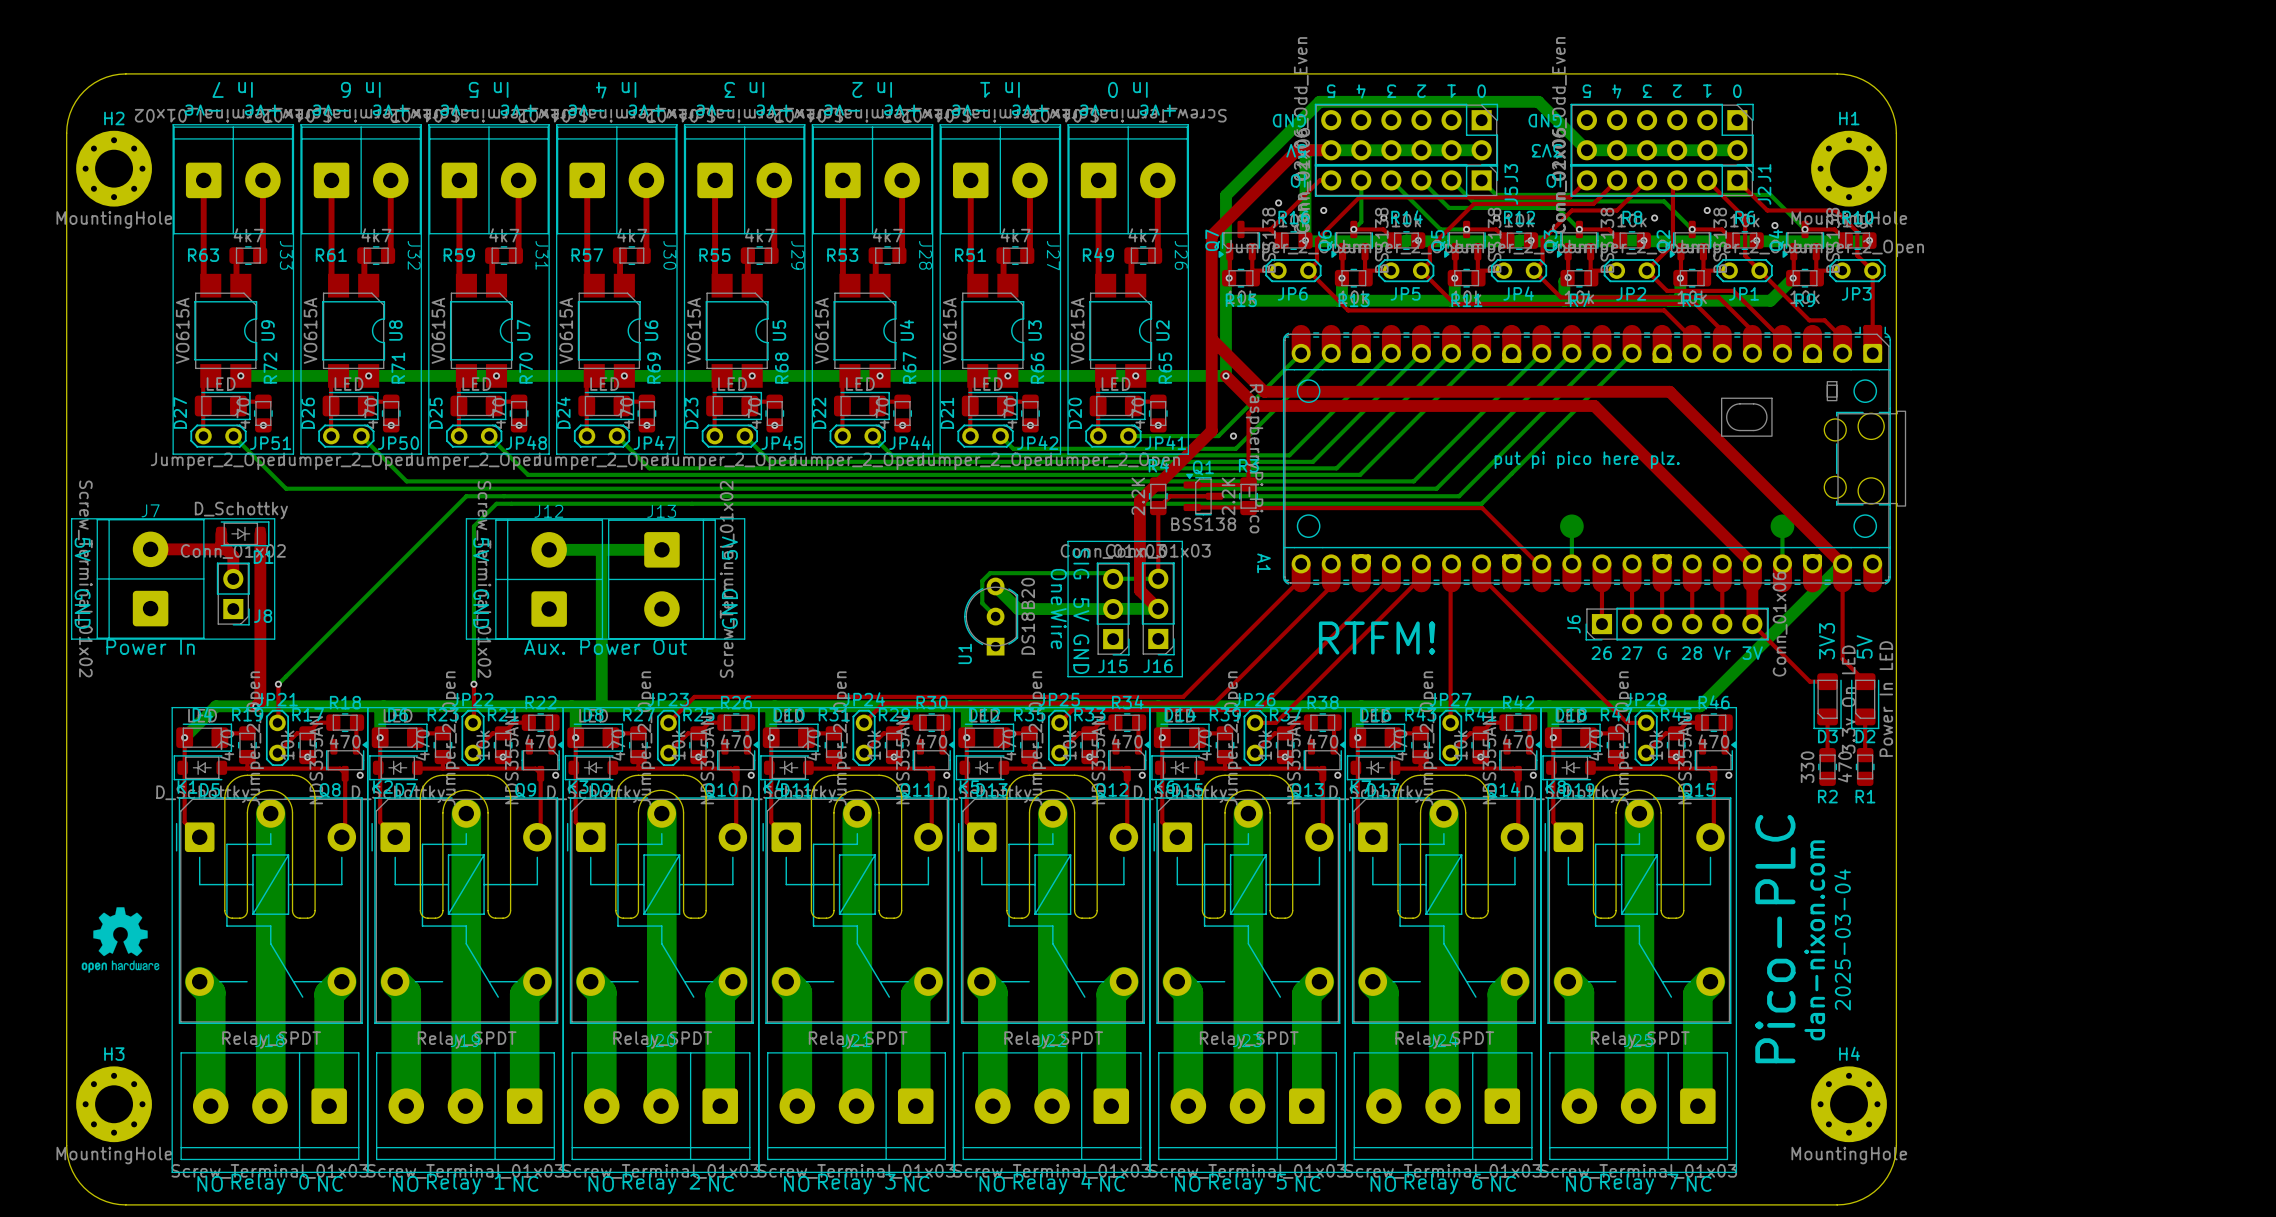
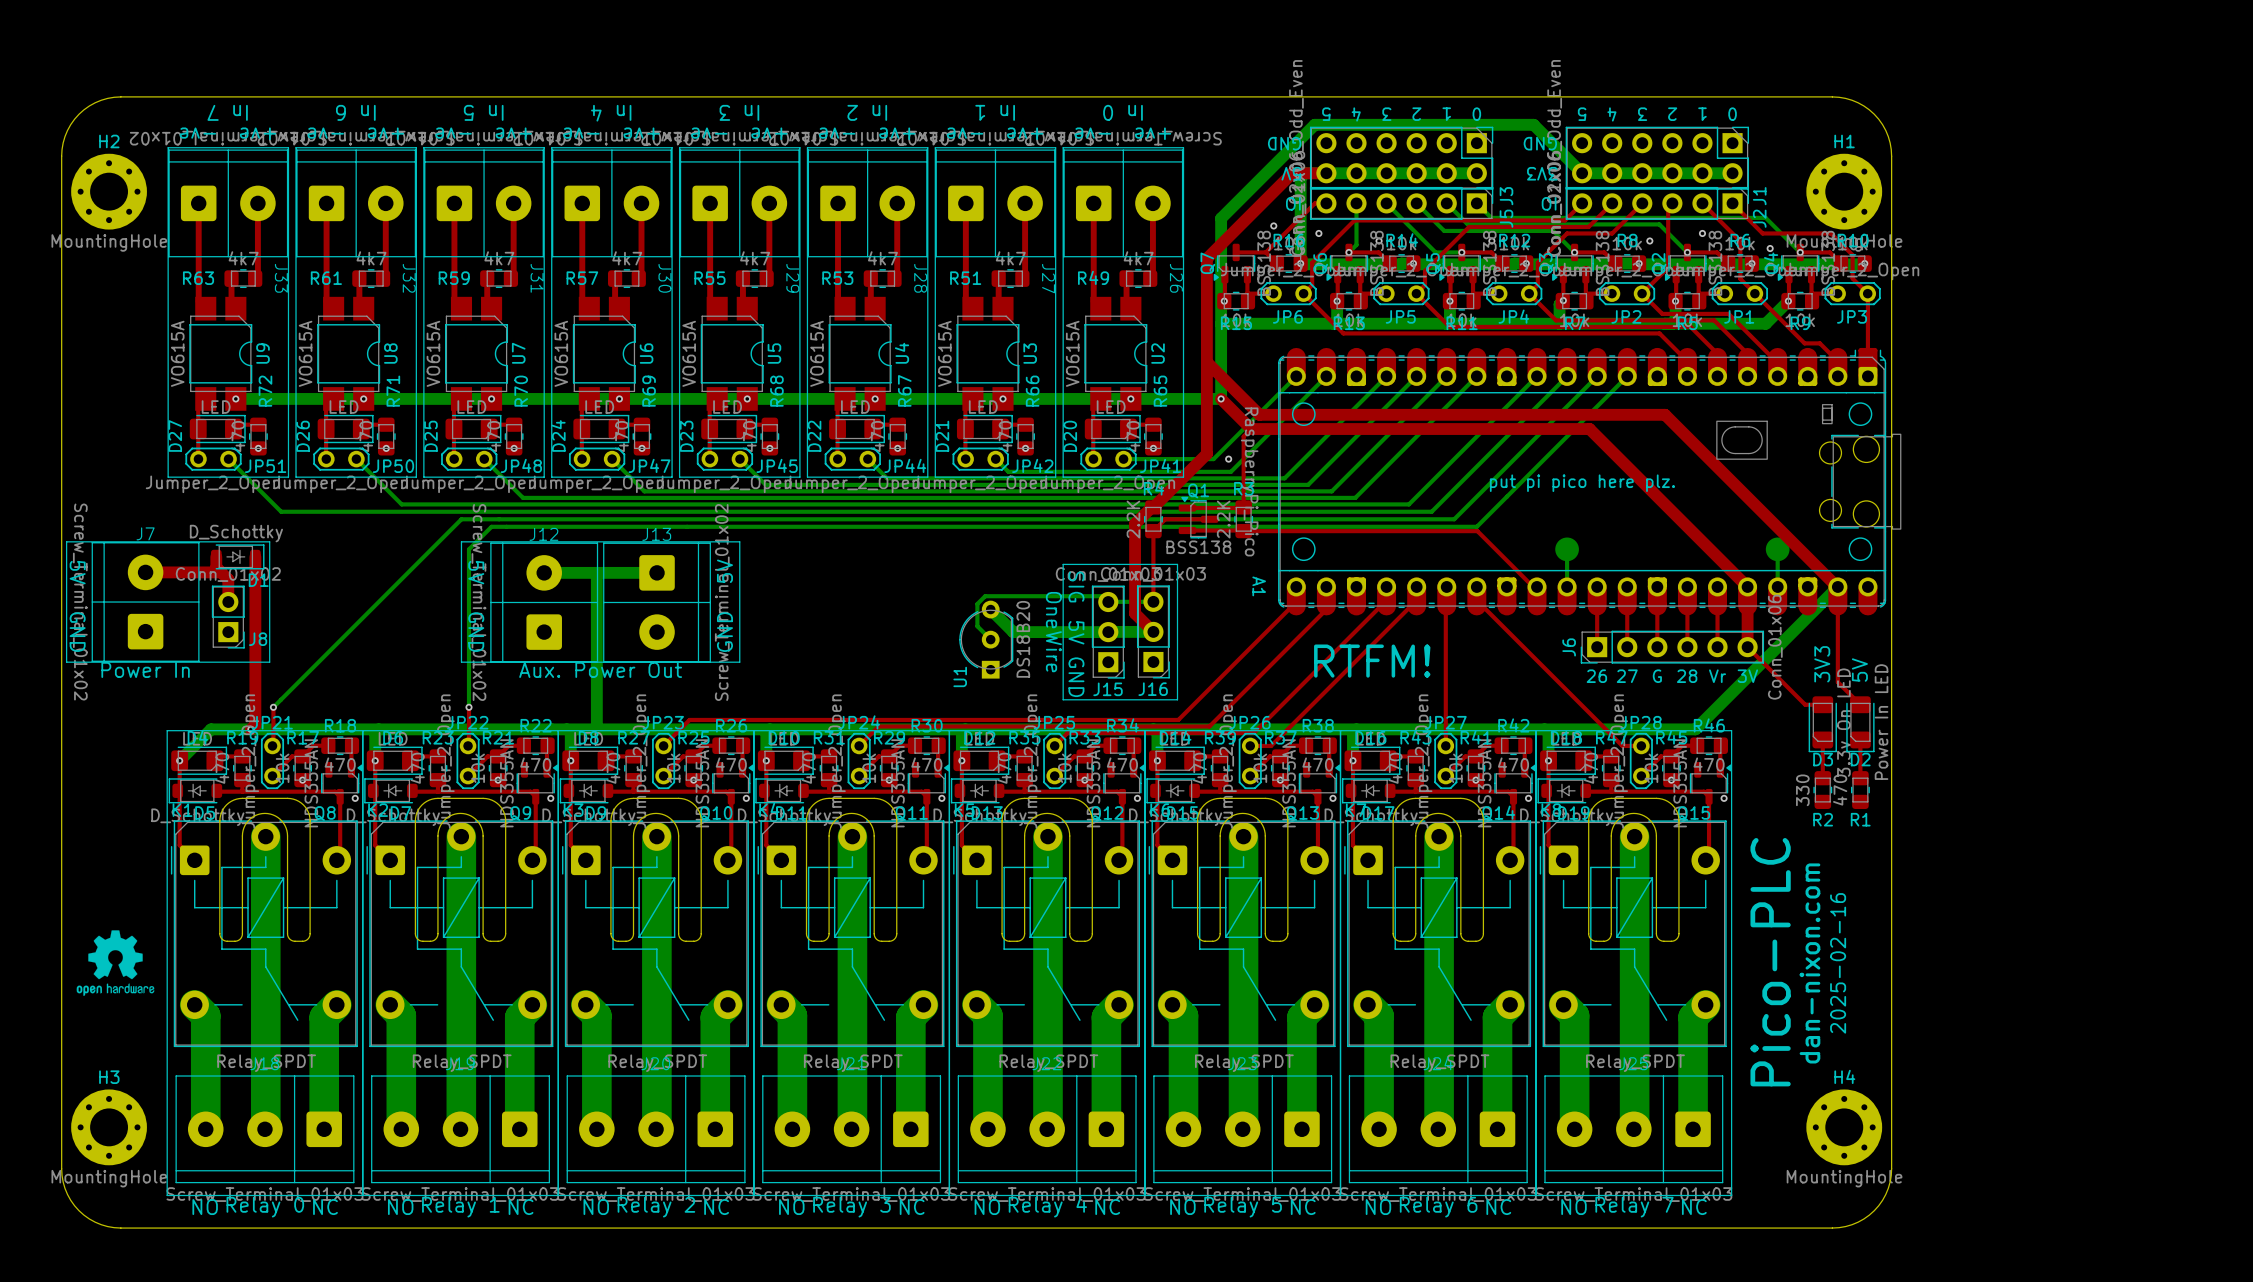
text: 2025-03-04 (1842, 939) -> 2025-02-16 (1838, 963)

